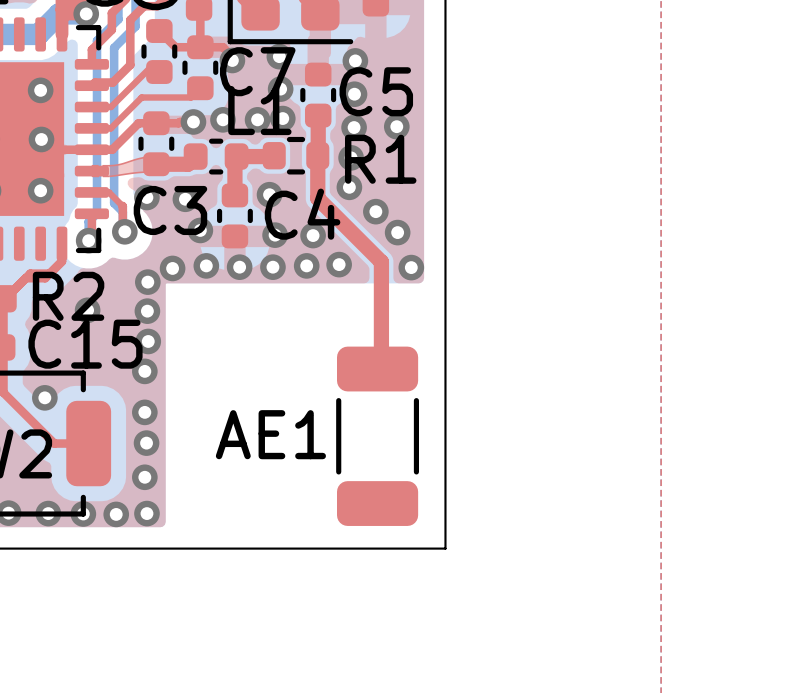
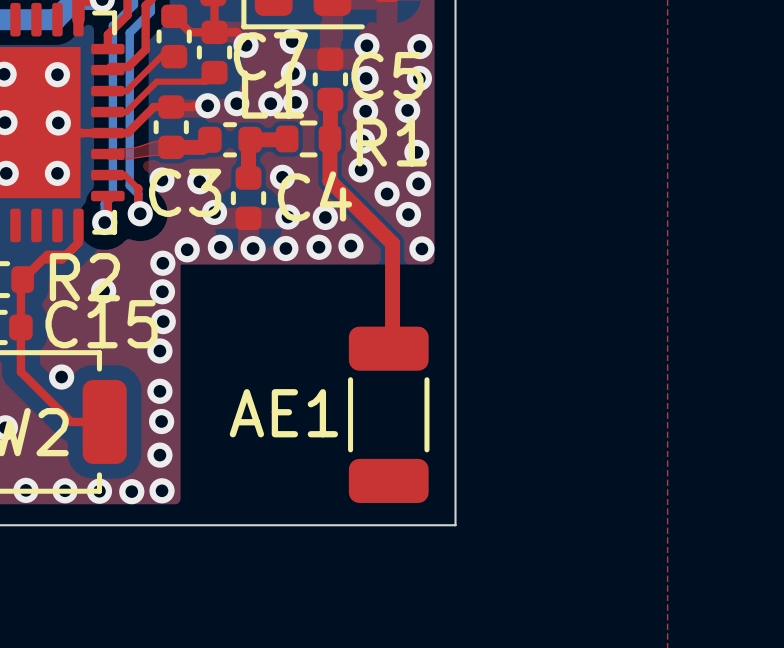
via: none -> (419, 46)
via: none -> (419, 78)
via: none -> (416, 152)
via: none -> (418, 183)

